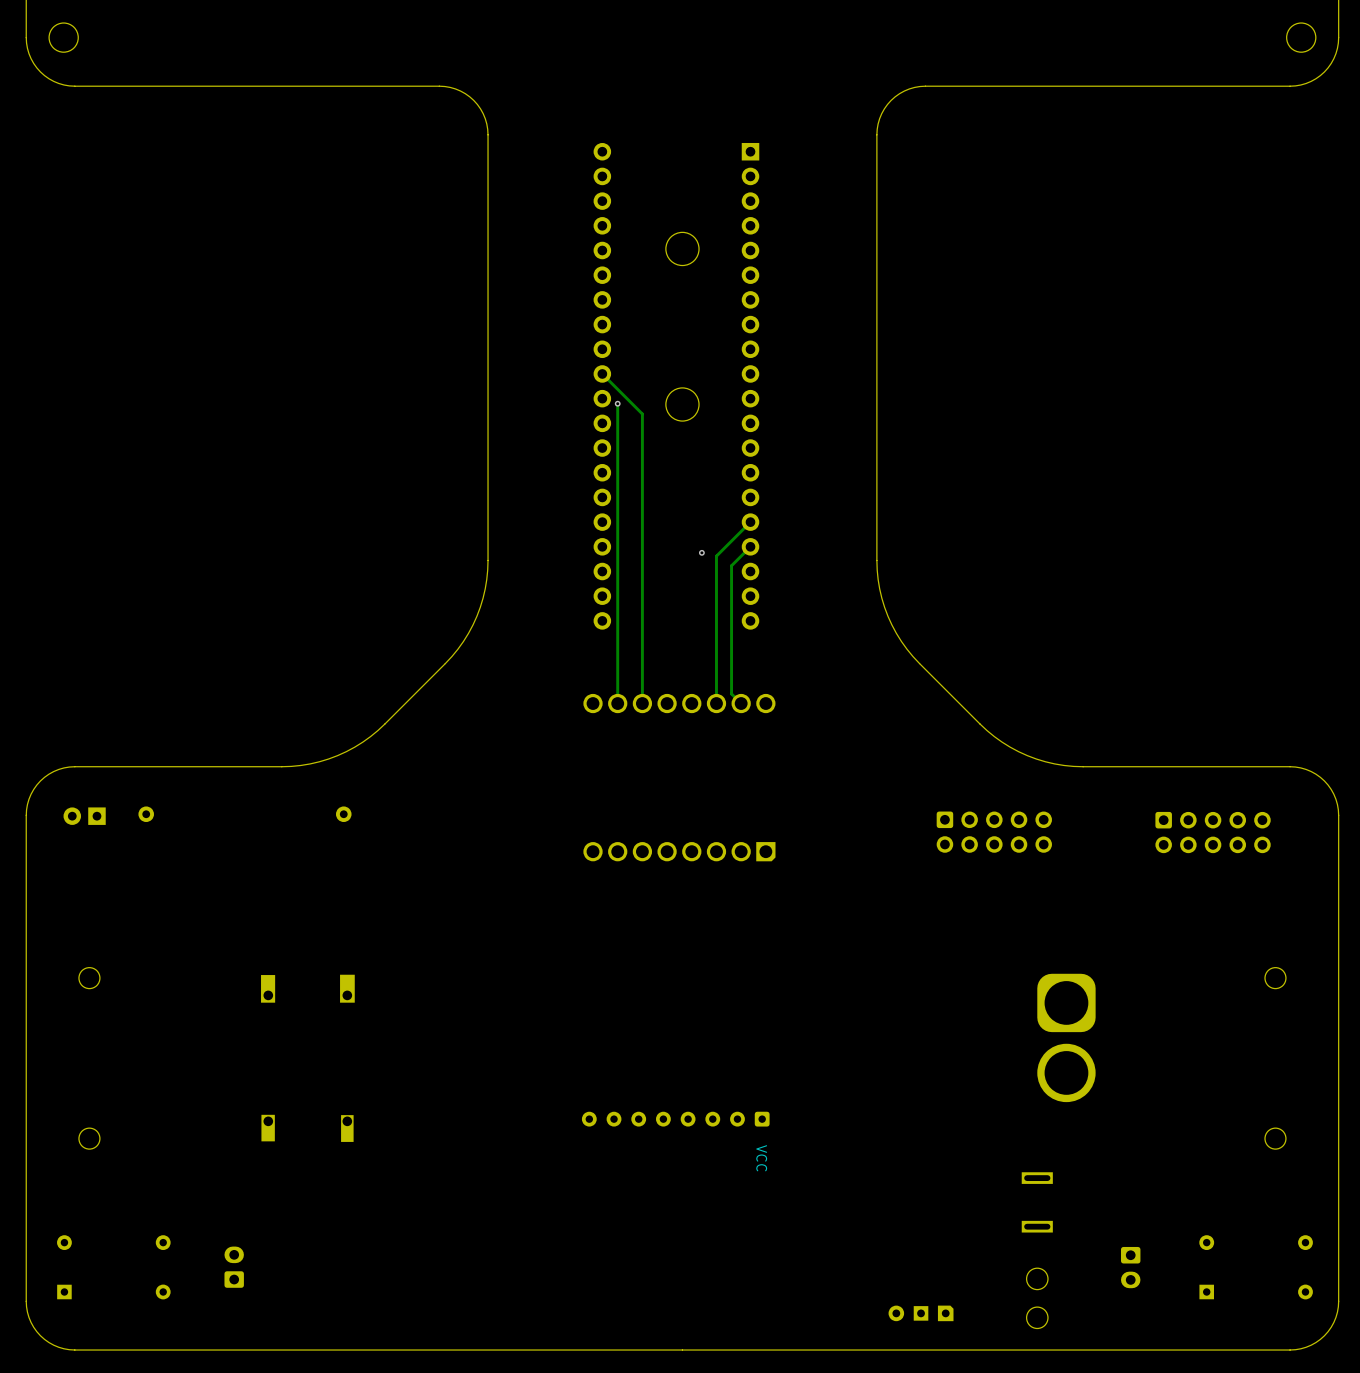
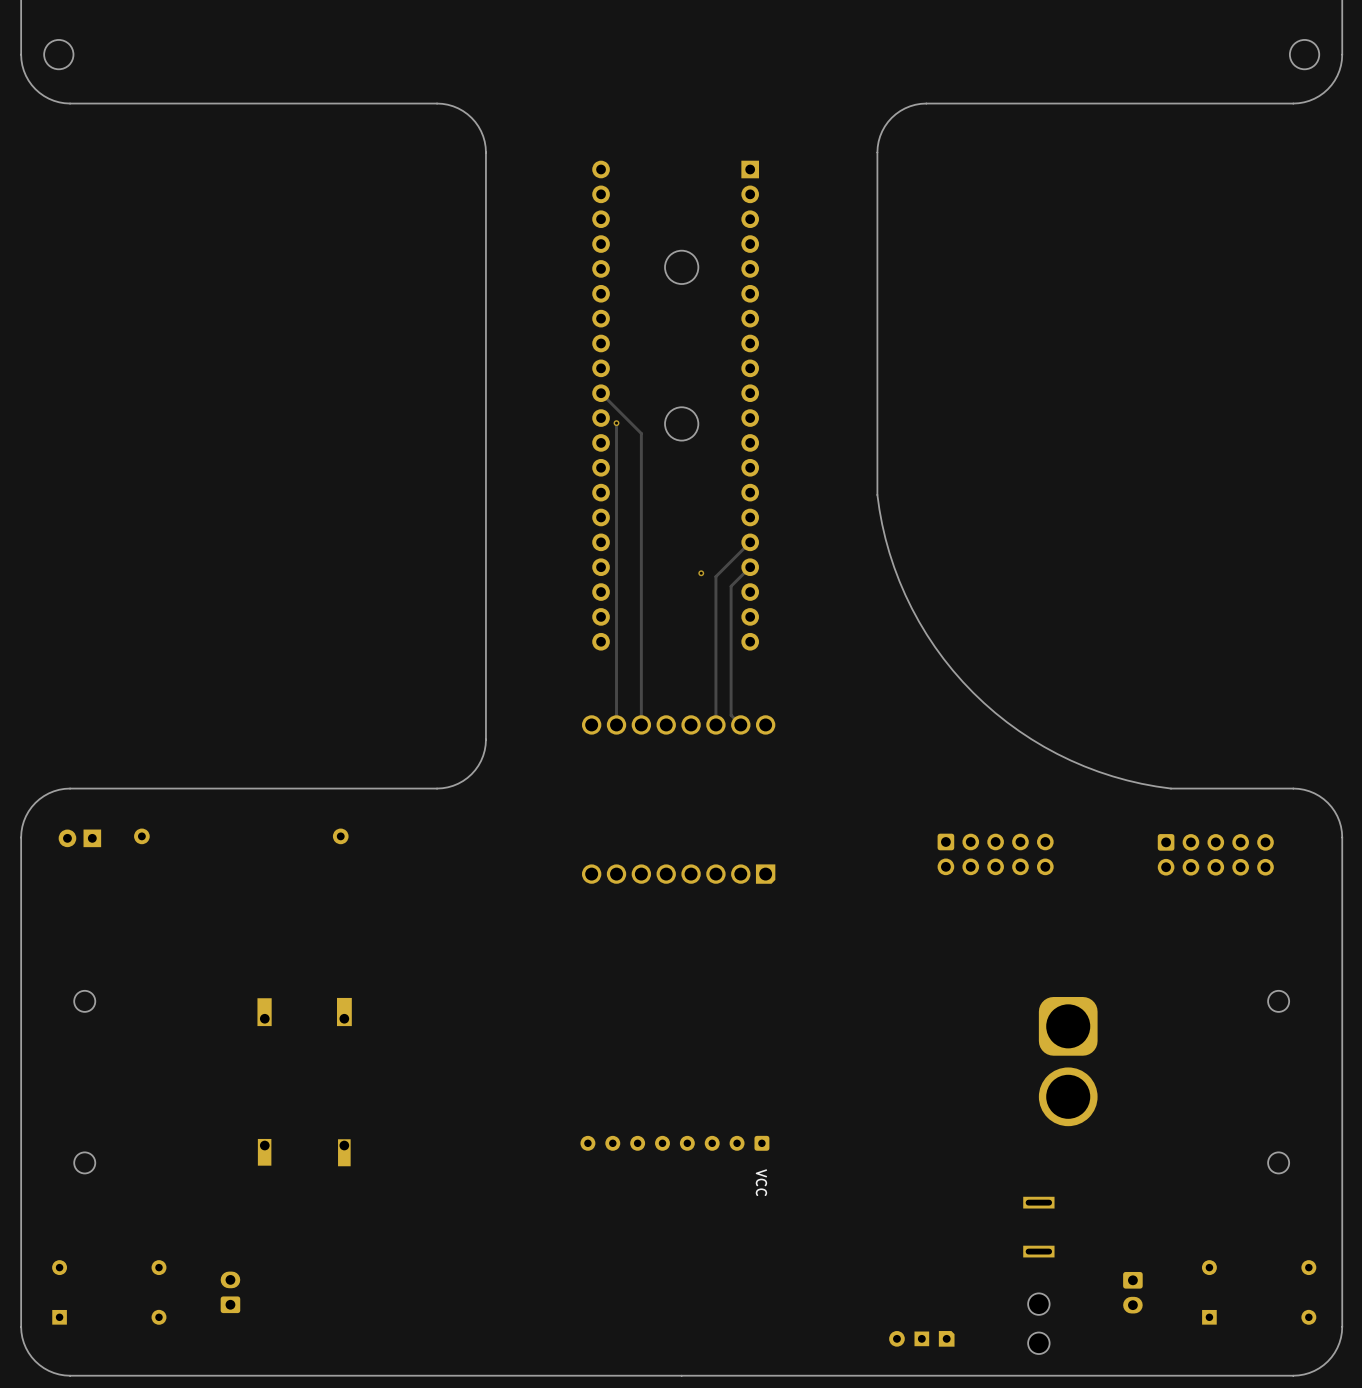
board edge: (876, 475) (876, 560) (879, 588) (887, 616) (896, 633) (919, 663) (986, 730) (1002, 742) (1027, 755) (1045, 761) (1073, 766) (1168, 766) -> (877, 494) (889, 553) (911, 608) (934, 646) (973, 692) (1018, 730) (1070, 760) (1126, 780) (1170, 788)
board edge: (488, 560) (485, 588) (476, 616) (463, 641) (445, 663) (384, 724) (362, 742) (337, 755) (319, 761) (281, 766) -> (485, 580) (485, 745) (481, 760) (471, 774) (458, 783) (442, 788) (278, 788)

